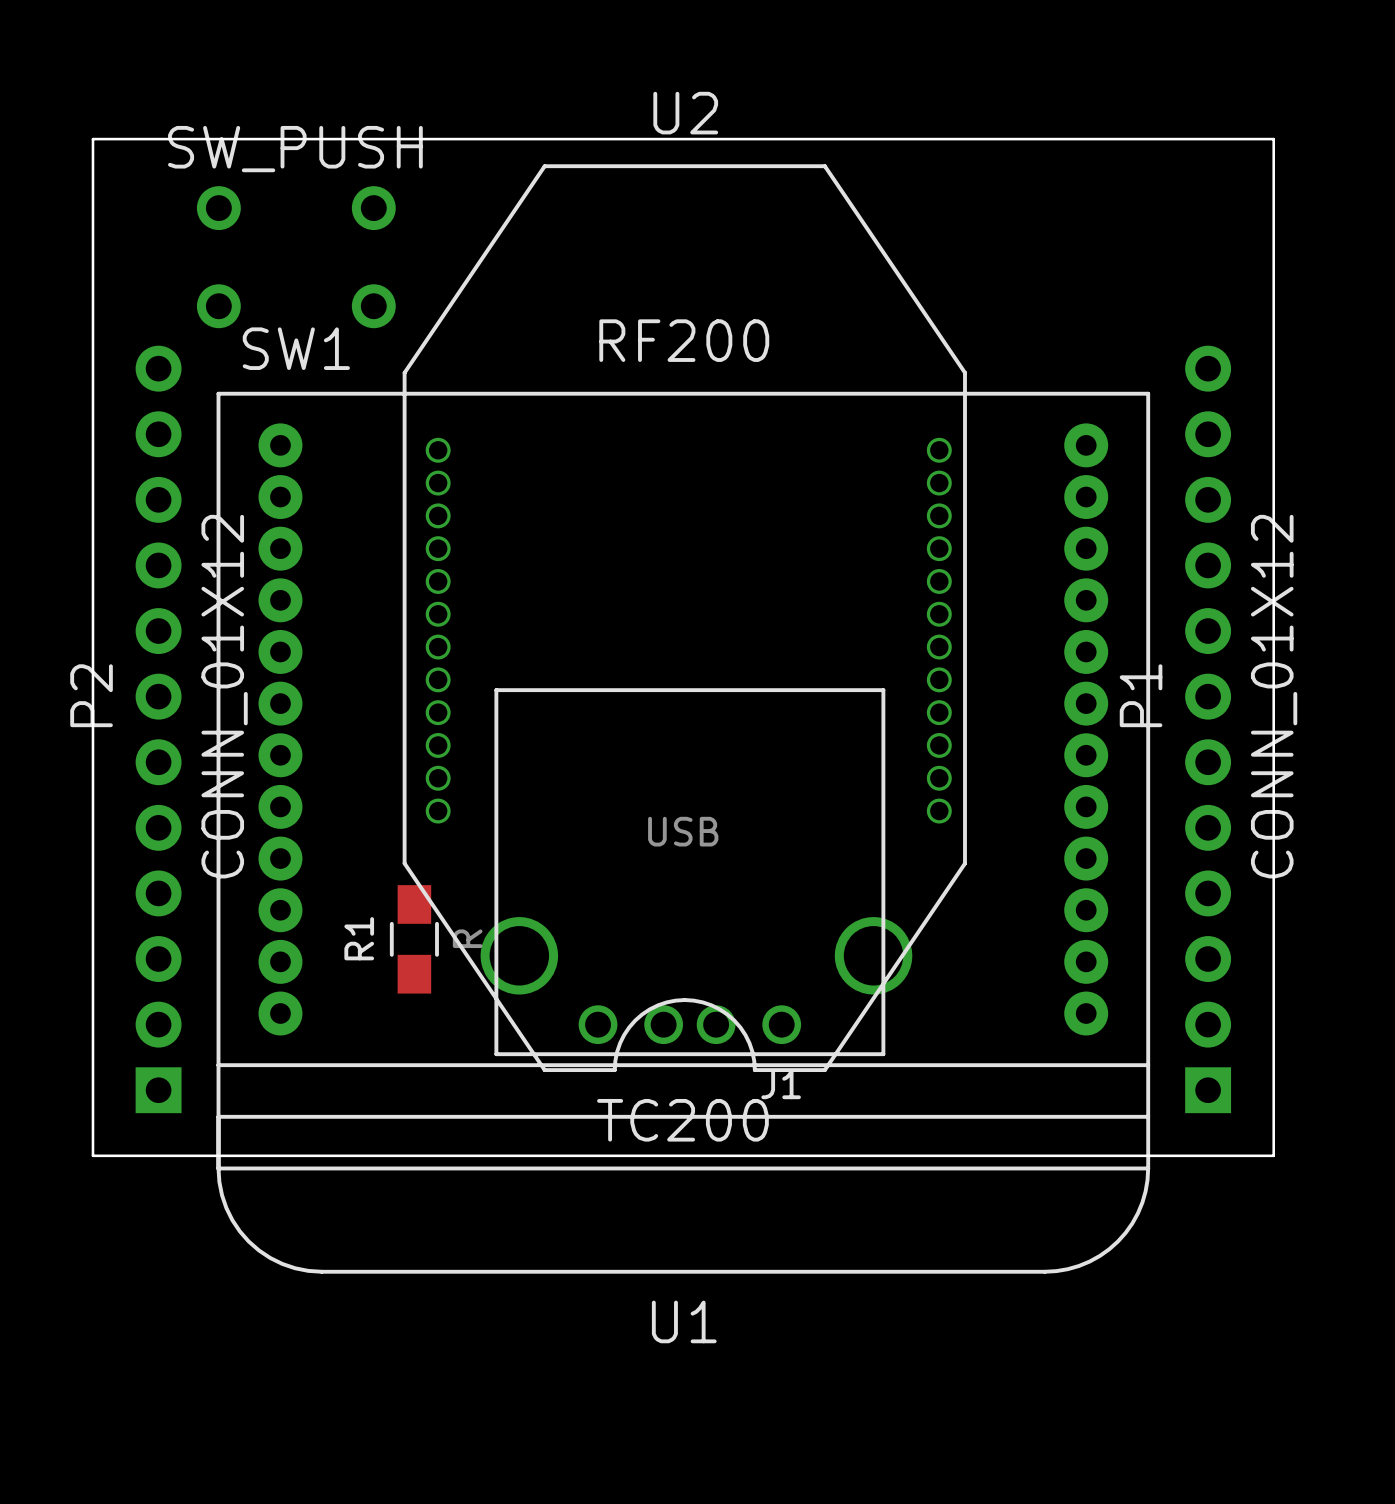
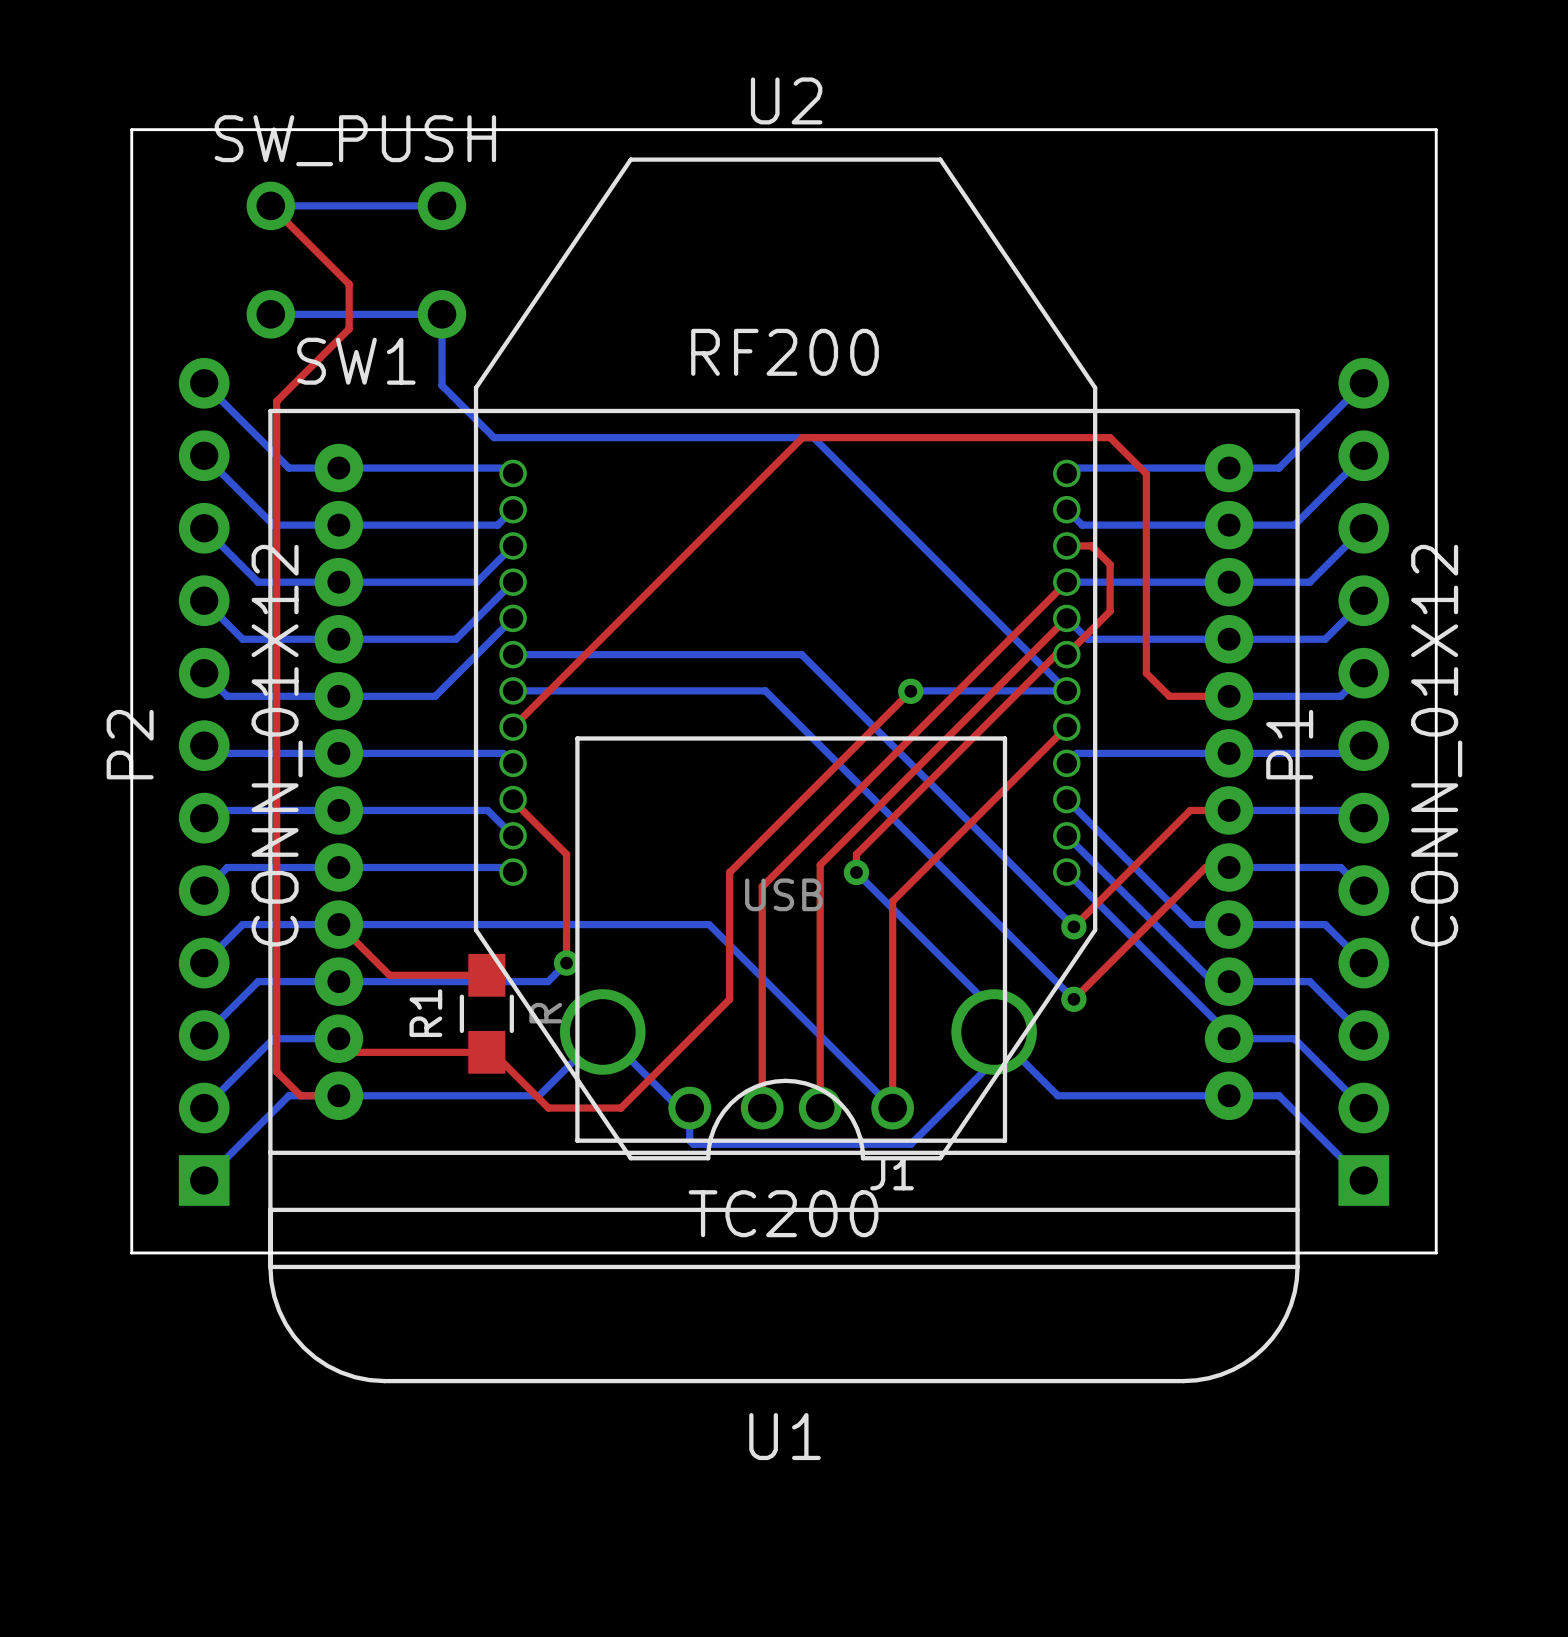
bottom track: none -> (270, 205) (442, 205)
top track: none -> (270, 205) (349, 284) (349, 328) (276, 401) (276, 1071) (300, 1095) (338, 1095)
bottom track: none -> (270, 314) (442, 314) (442, 385) (494, 437) (813, 437) (1066, 690) (910, 691)
bottom track: none -> (204, 383) (288, 468) (507, 468) (513, 473)
bottom track: none -> (1363, 383) (1279, 468) (1072, 468) (1066, 473)
bottom track: none -> (204, 455) (273, 525) (497, 525) (513, 509)
bottom track: none -> (1363, 455) (1294, 525) (1082, 525) (1066, 509)
bottom track: none -> (204, 528) (258, 582) (476, 582) (513, 545)
bottom track: none -> (1363, 528) (1309, 582) (1066, 582)
top track: none -> (1066, 545) (1091, 545) (1110, 564) (1110, 611) (1066, 654) (1056, 654) (856, 854) (856, 872)
bottom track: none -> (513, 582) (456, 639) (242, 639) (204, 600)
top track: none -> (1066, 582) (762, 886) (762, 1108)
bottom track: none -> (1363, 600) (1325, 639) (1087, 639) (1066, 618)
bottom track: none -> (513, 618) (435, 696) (227, 696) (204, 673)
top track: none -> (1066, 618) (820, 865) (820, 1108)
bottom track: none -> (513, 654) (801, 654) (1073, 926)
bottom track: none -> (1363, 673) (1340, 696) (1229, 696)
bottom track: none -> (513, 690) (765, 690) (1073, 999)
top track: none -> (910, 691) (729, 872) (729, 999) (620, 1108) (548, 1108) (492, 1052) (352, 1052) (338, 1038)
via: none -> (910, 691)
top track: none -> (1229, 696) (1169, 696) (1146, 673) (1146, 473) (1110, 437) (802, 437) (513, 727)
top track: none -> (1066, 727) (892, 901) (892, 1108)
bottom track: none -> (204, 745) (211, 753) (503, 753) (513, 763)
bottom track: none -> (1363, 745) (1356, 753) (1076, 753) (1066, 763)
top track: none -> (513, 799) (566, 854) (566, 963)
bottom track: none -> (1066, 799) (1191, 924) (1325, 924) (1363, 963)
bottom track: none -> (1229, 810) (1356, 810) (1363, 818)
top track: none -> (1229, 810) (1190, 810) (1073, 926)
bottom track: none -> (204, 818) (211, 810) (487, 810) (513, 835)
bottom track: none -> (1066, 835) (1212, 981) (1309, 981) (1363, 1035)
bottom track: none -> (1229, 867) (1340, 867) (1363, 890)
top track: none -> (1229, 867) (1205, 867) (1073, 999)
bottom track: none -> (513, 872) (508, 867) (227, 867) (204, 890)
bottom track: none -> (856, 872) (994, 1010) (994, 1060) (910, 1144) (693, 1144) (689, 1140) (689, 1108) (678, 1108) (602, 1031) (539, 1095) (288, 1095) (204, 1180)
via: none -> (856, 872)
bottom track: none -> (1066, 872) (1229, 1034) (1229, 1038) (1294, 1038) (1363, 1108)
top track: none -> (338, 924) (389, 975) (486, 975)
via: none -> (1073, 926)
bottom track: none -> (204, 963) (242, 924) (709, 924) (892, 1108)
bottom track: none -> (566, 963) (548, 981) (258, 981) (204, 1035)
via: none -> (566, 963)
via: none -> (1073, 999)
bottom track: none -> (994, 1031) (1057, 1095) (1279, 1095) (1363, 1180)
bottom track: none -> (338, 1038) (273, 1038) (204, 1108)

